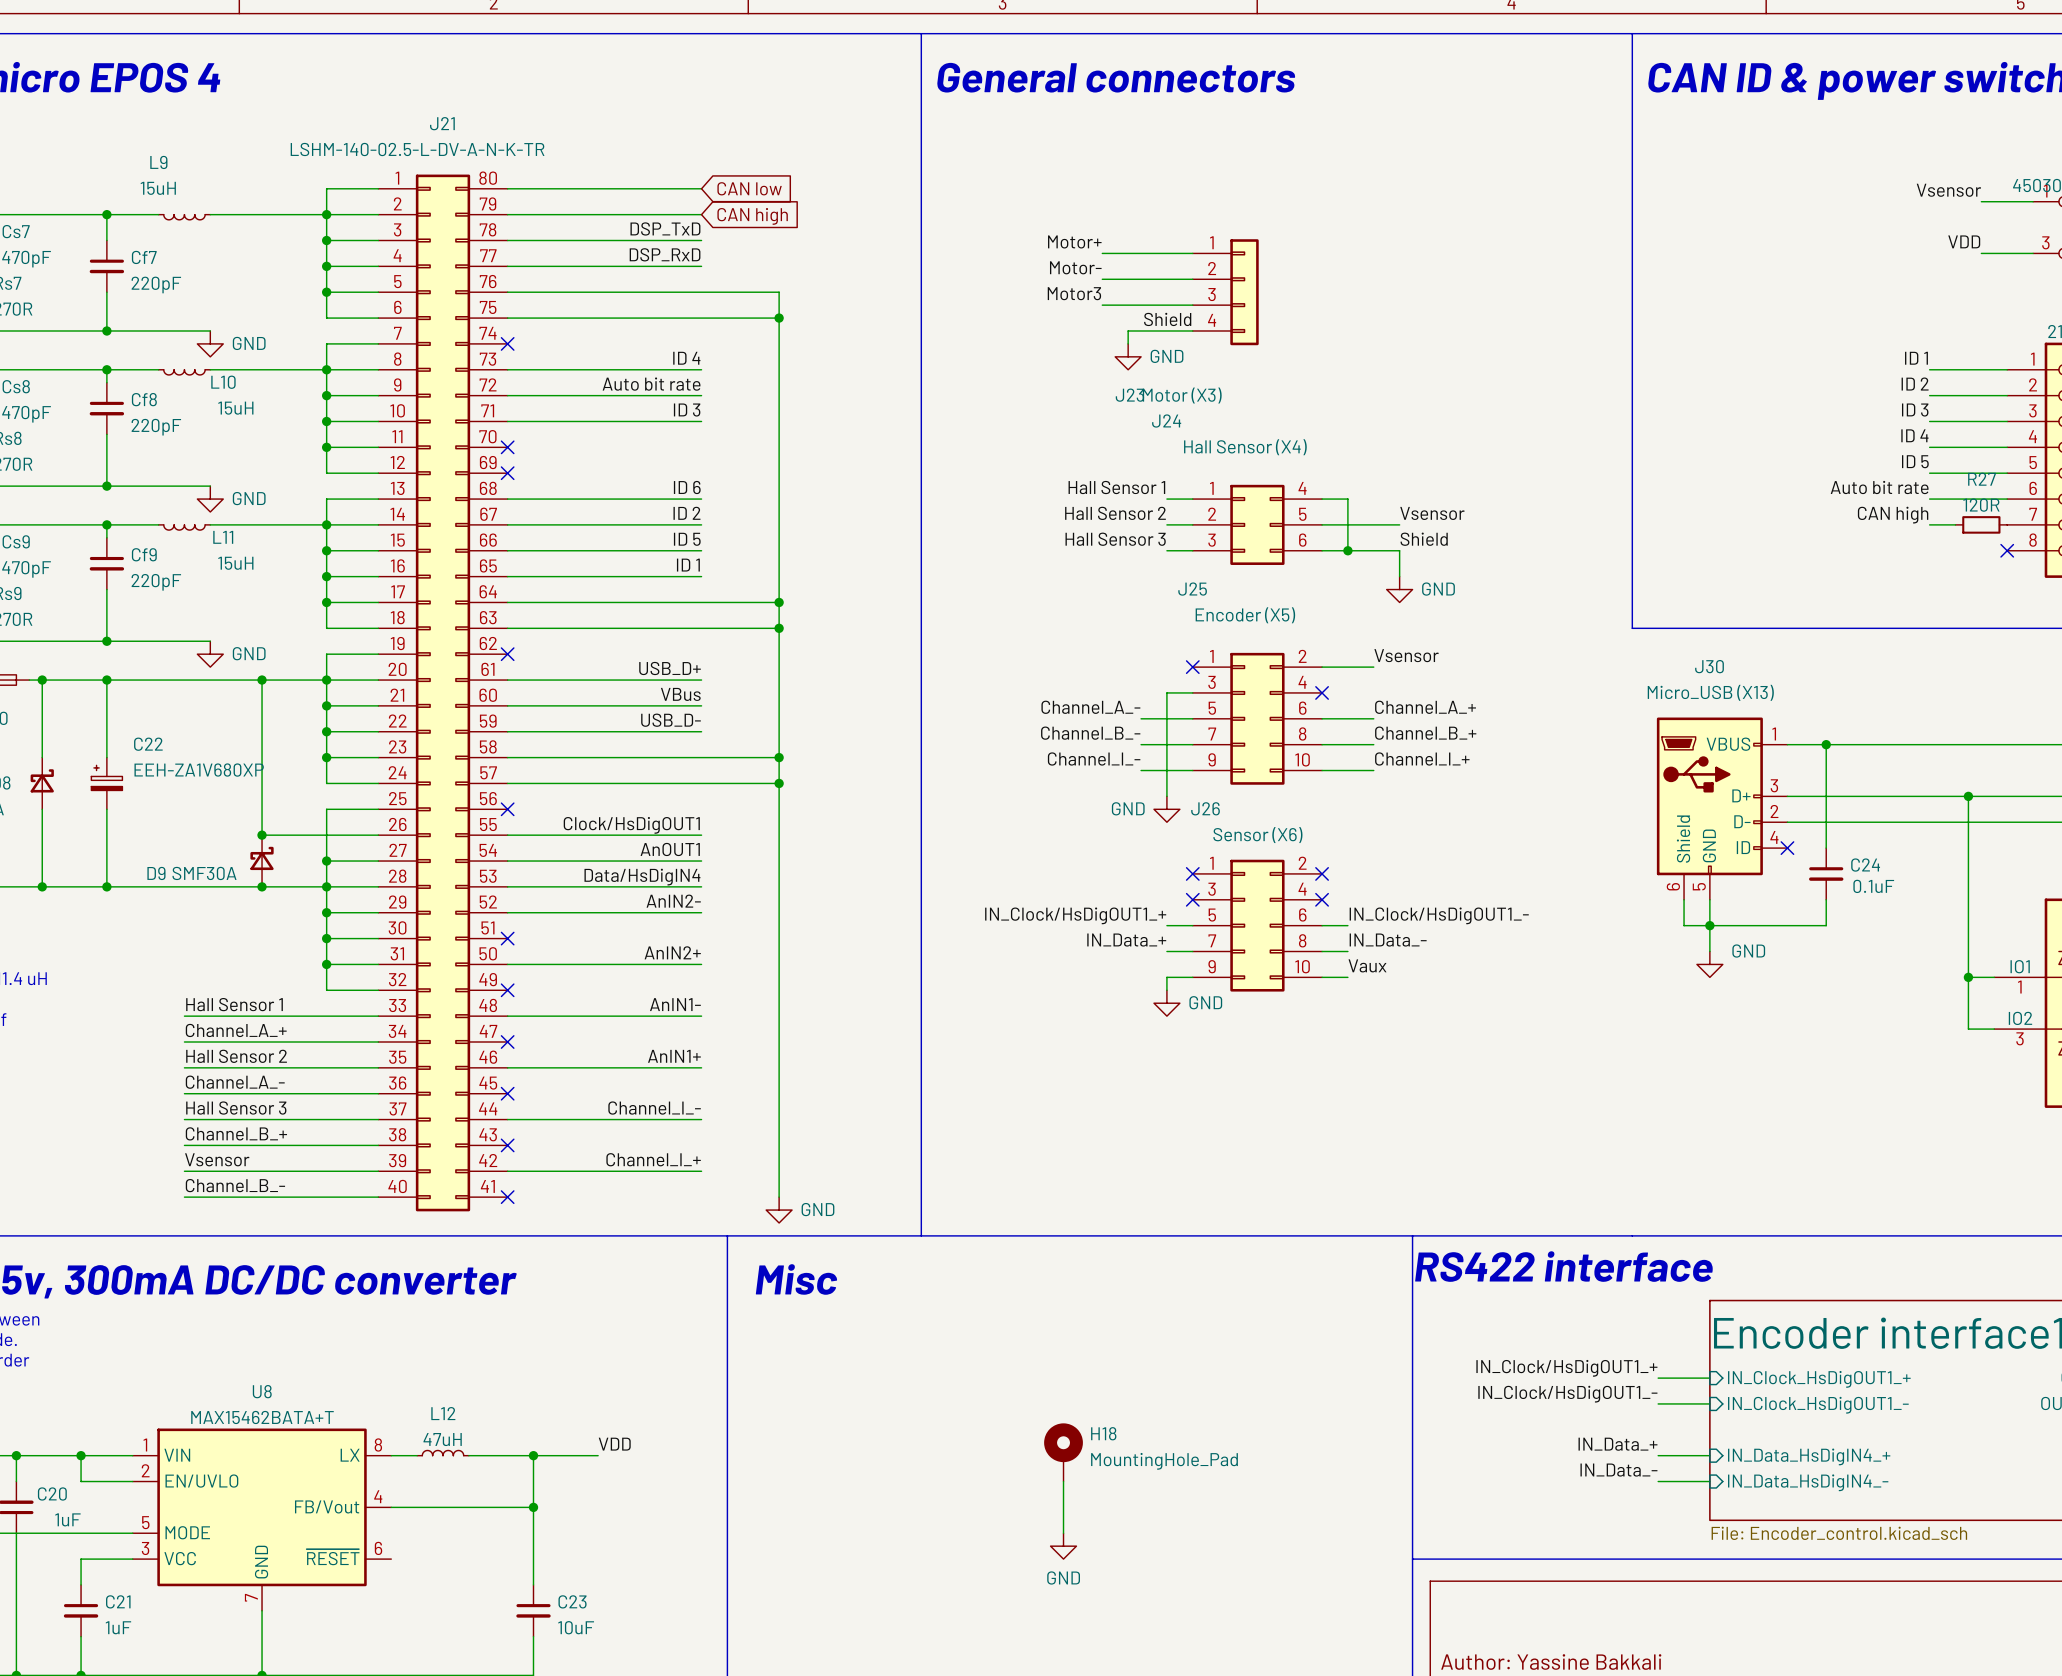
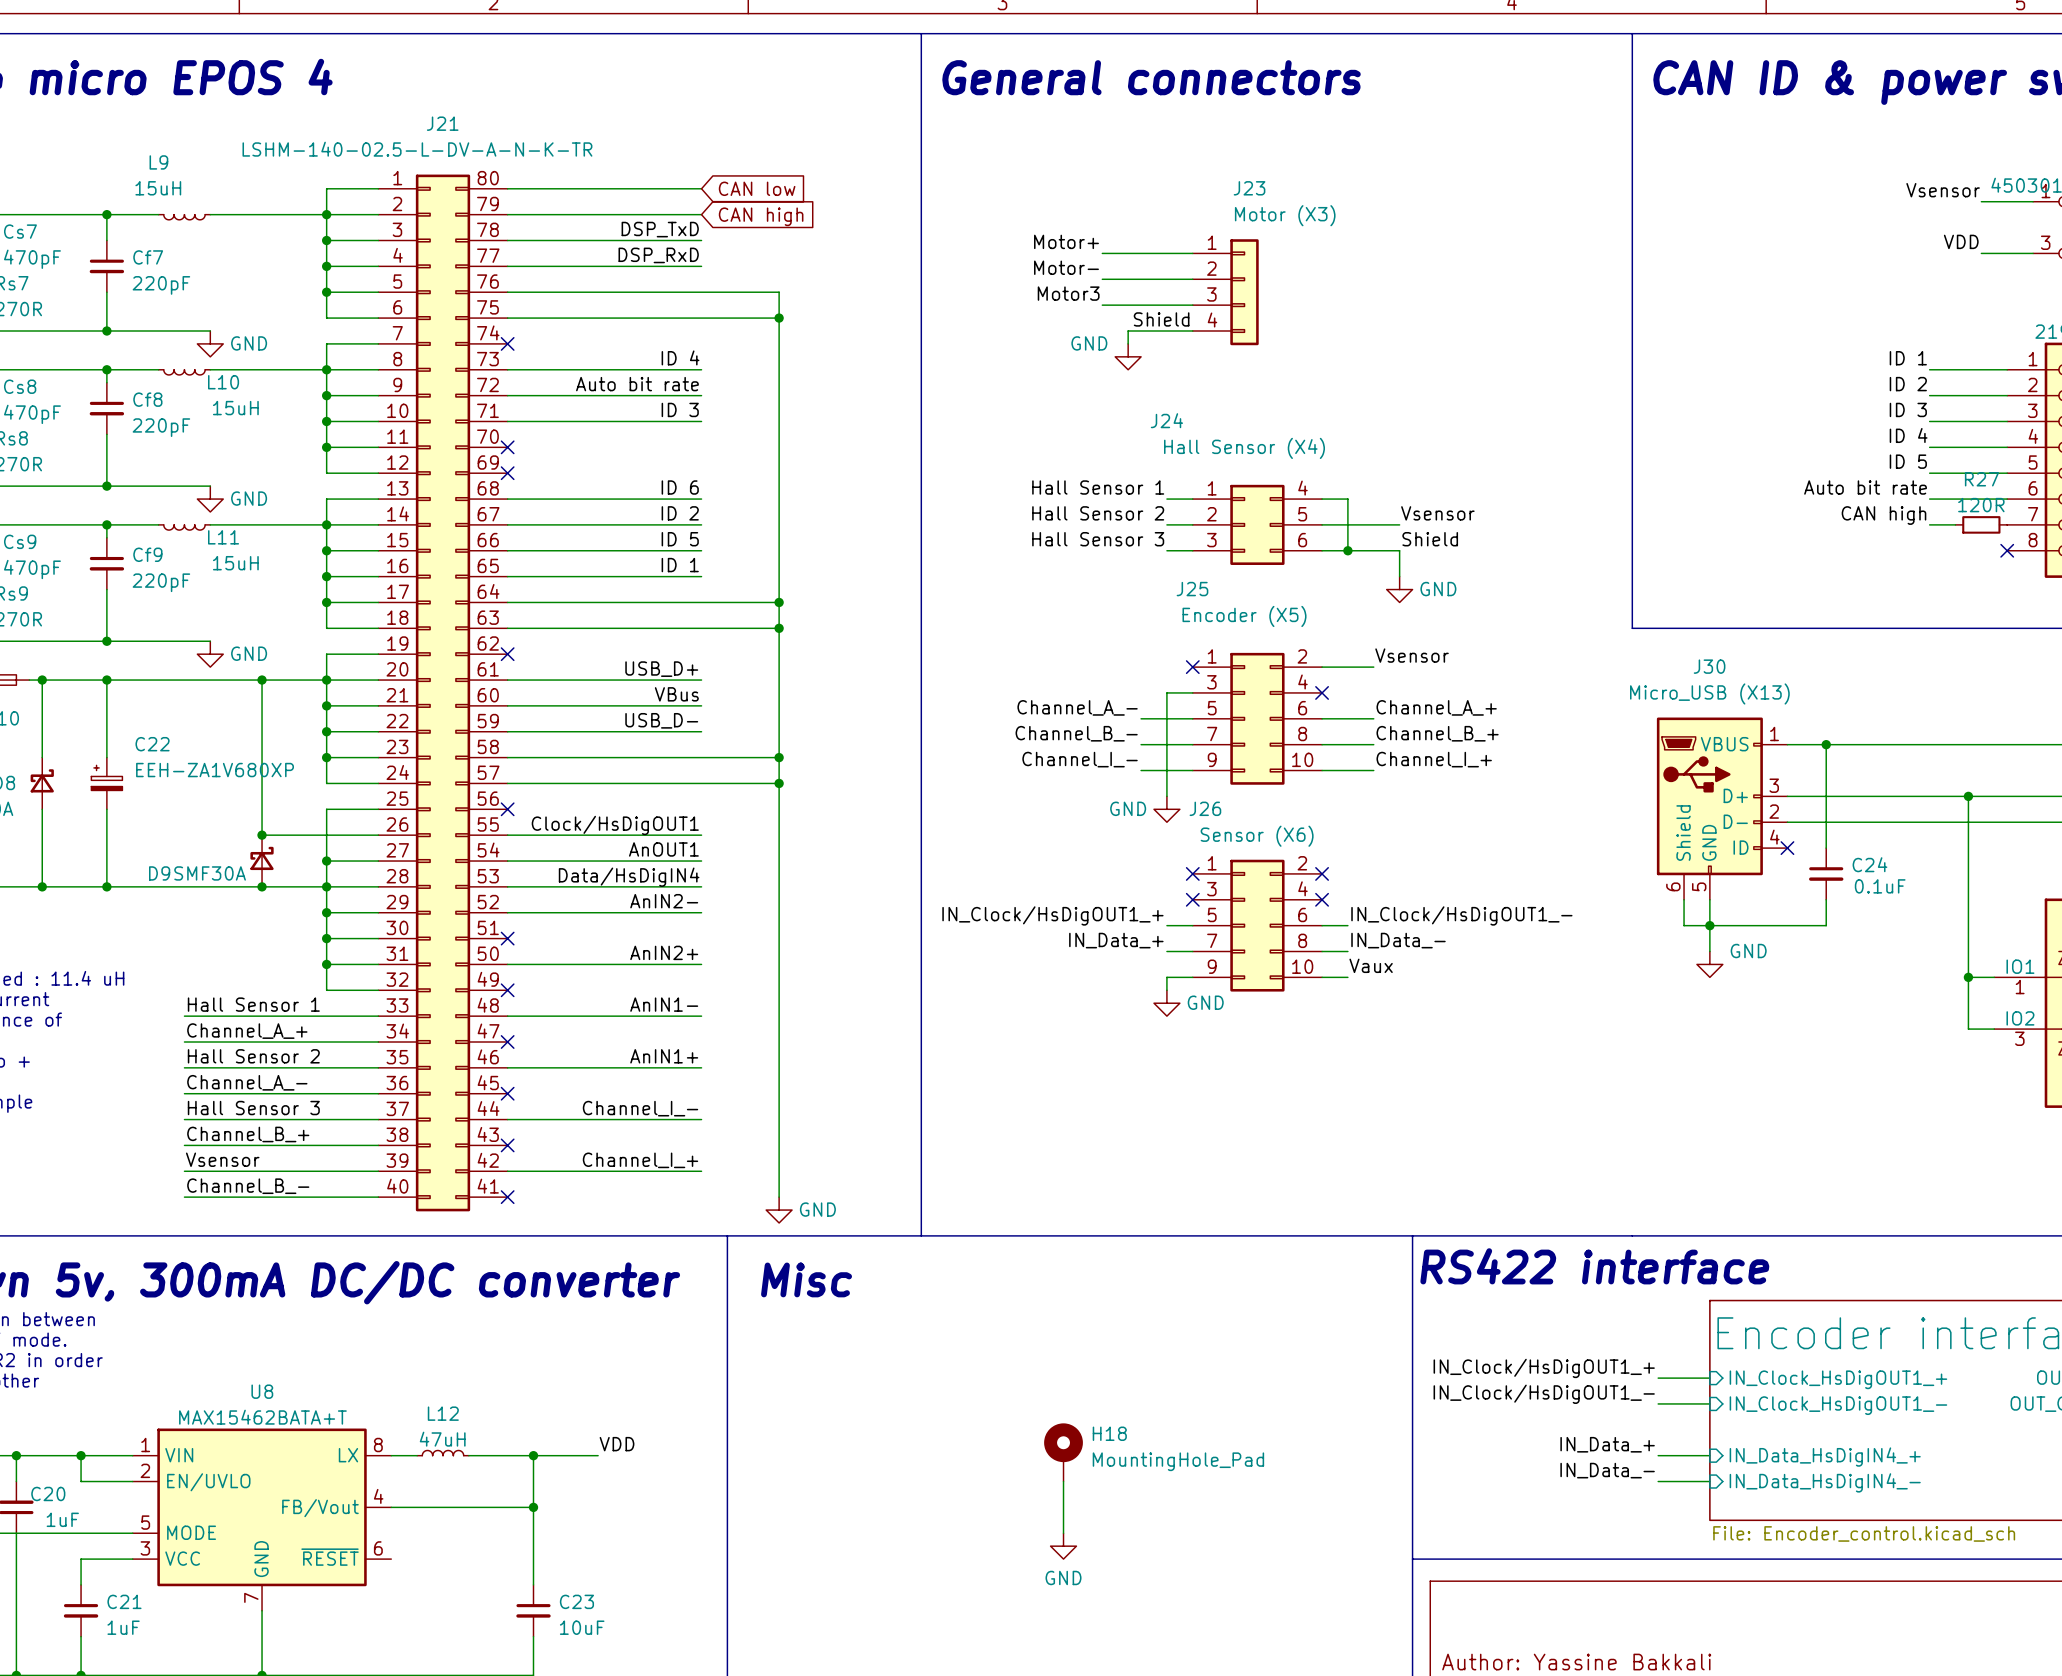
power symbol text position: GND (1167, 356) -> GND (1089, 343)
J23 name position: J23 (1129, 395) -> J23 (1249, 188)
J23 value position: Motor (X3) (1182, 395) -> Motor (X3) (1285, 215)

